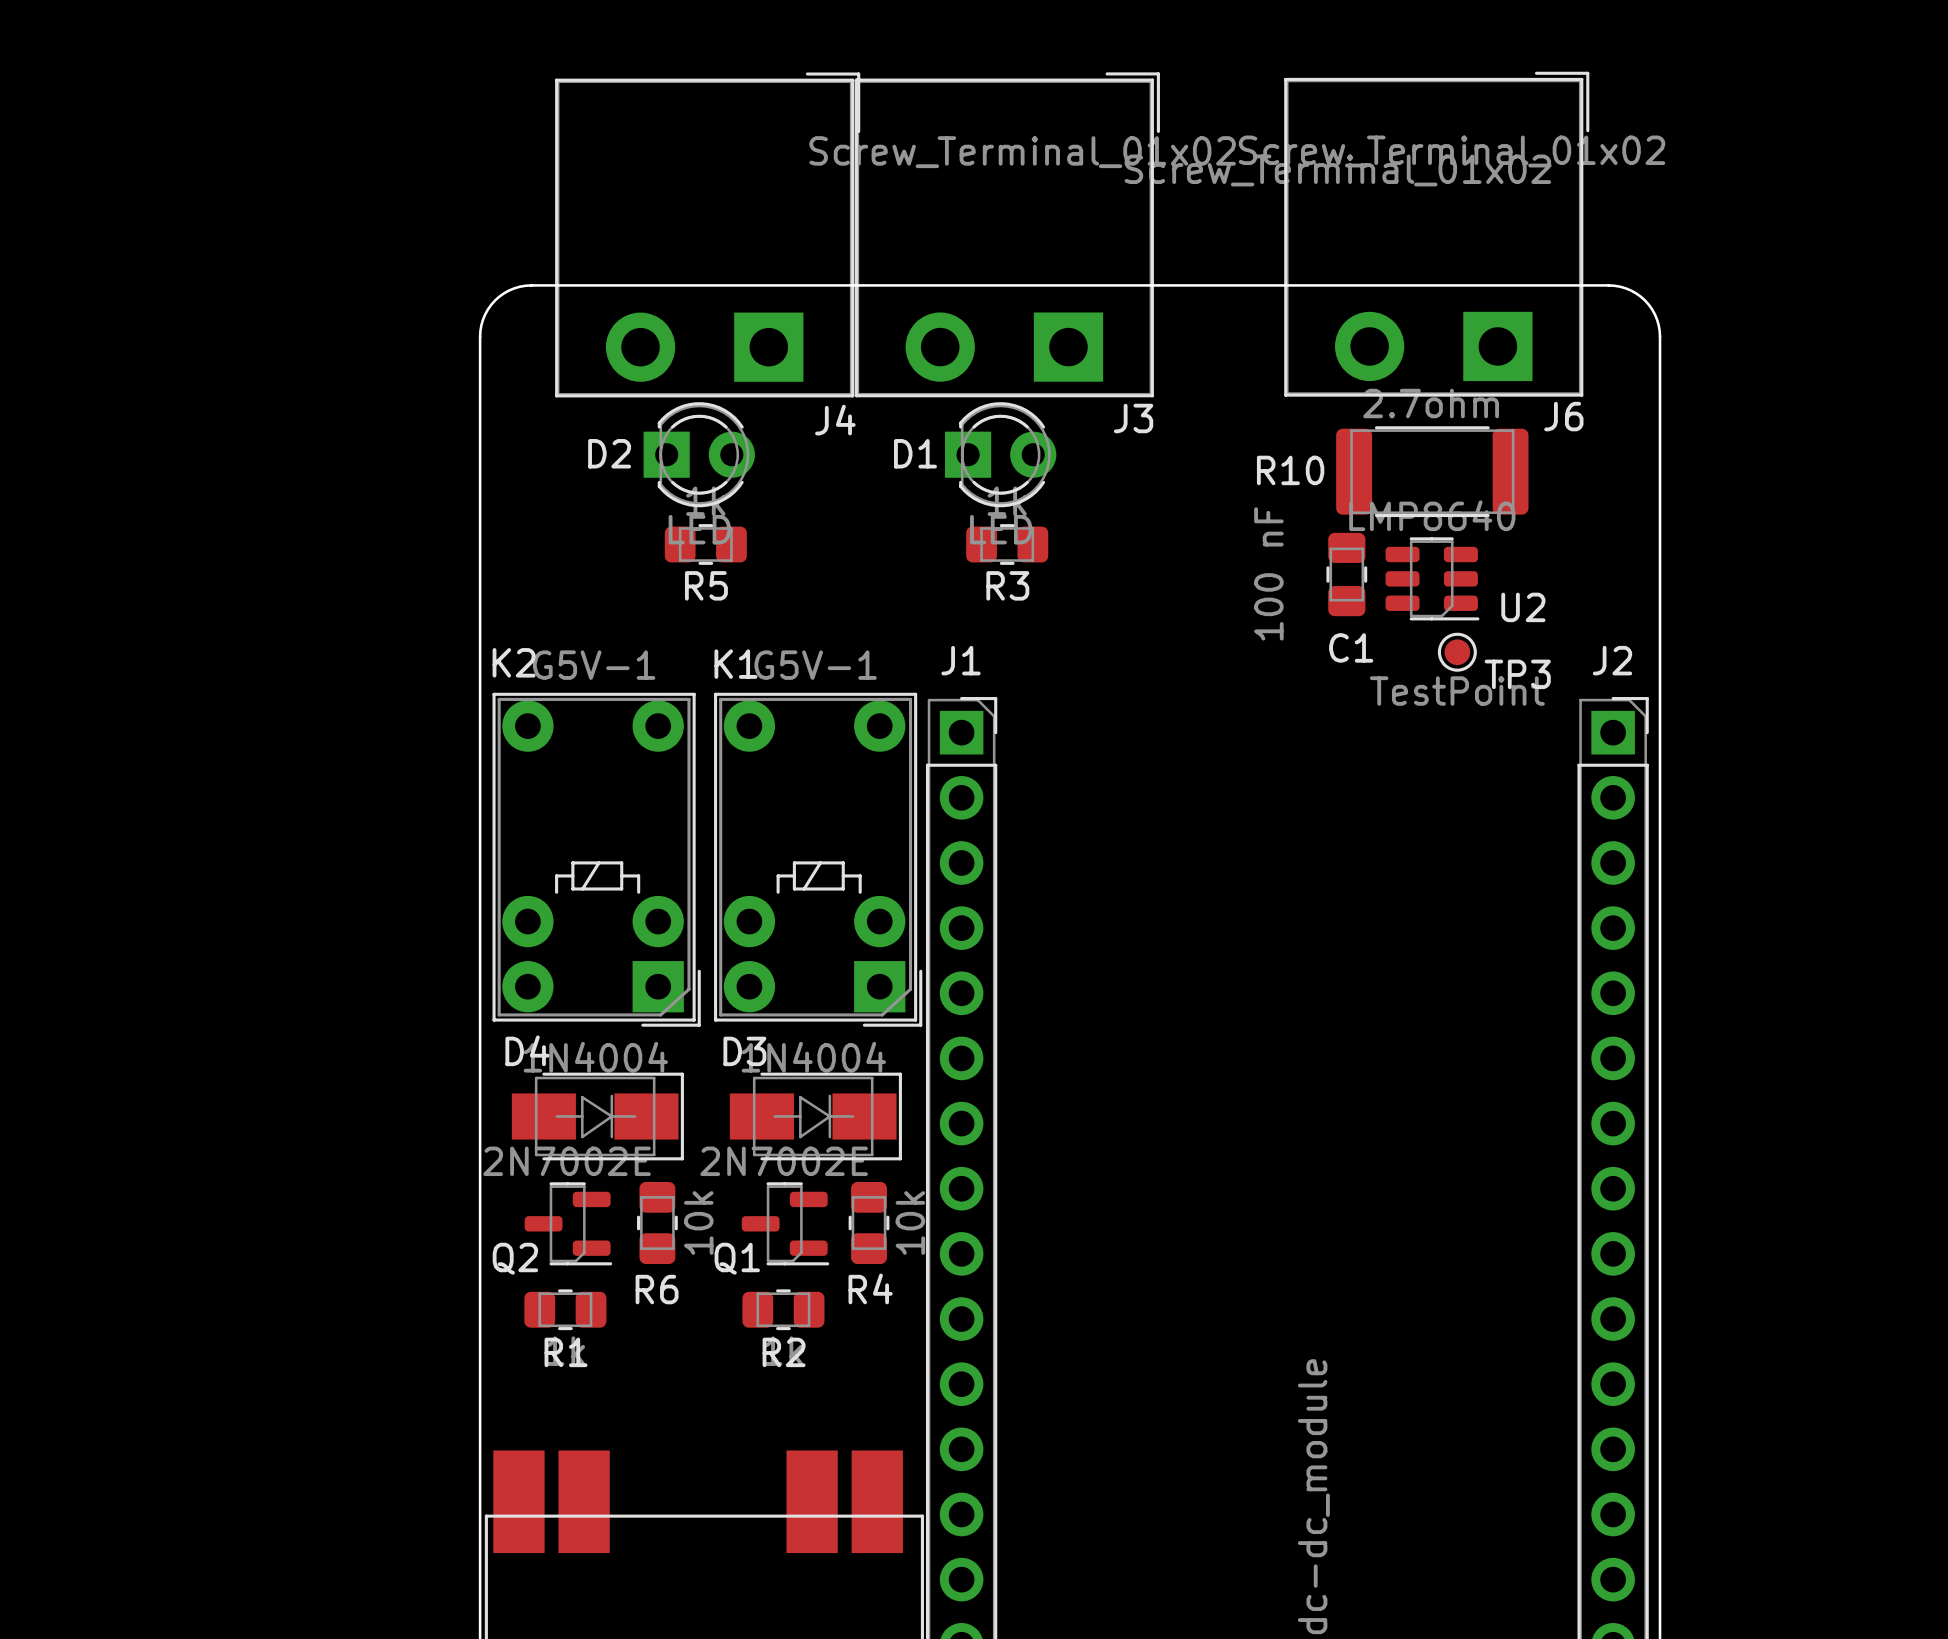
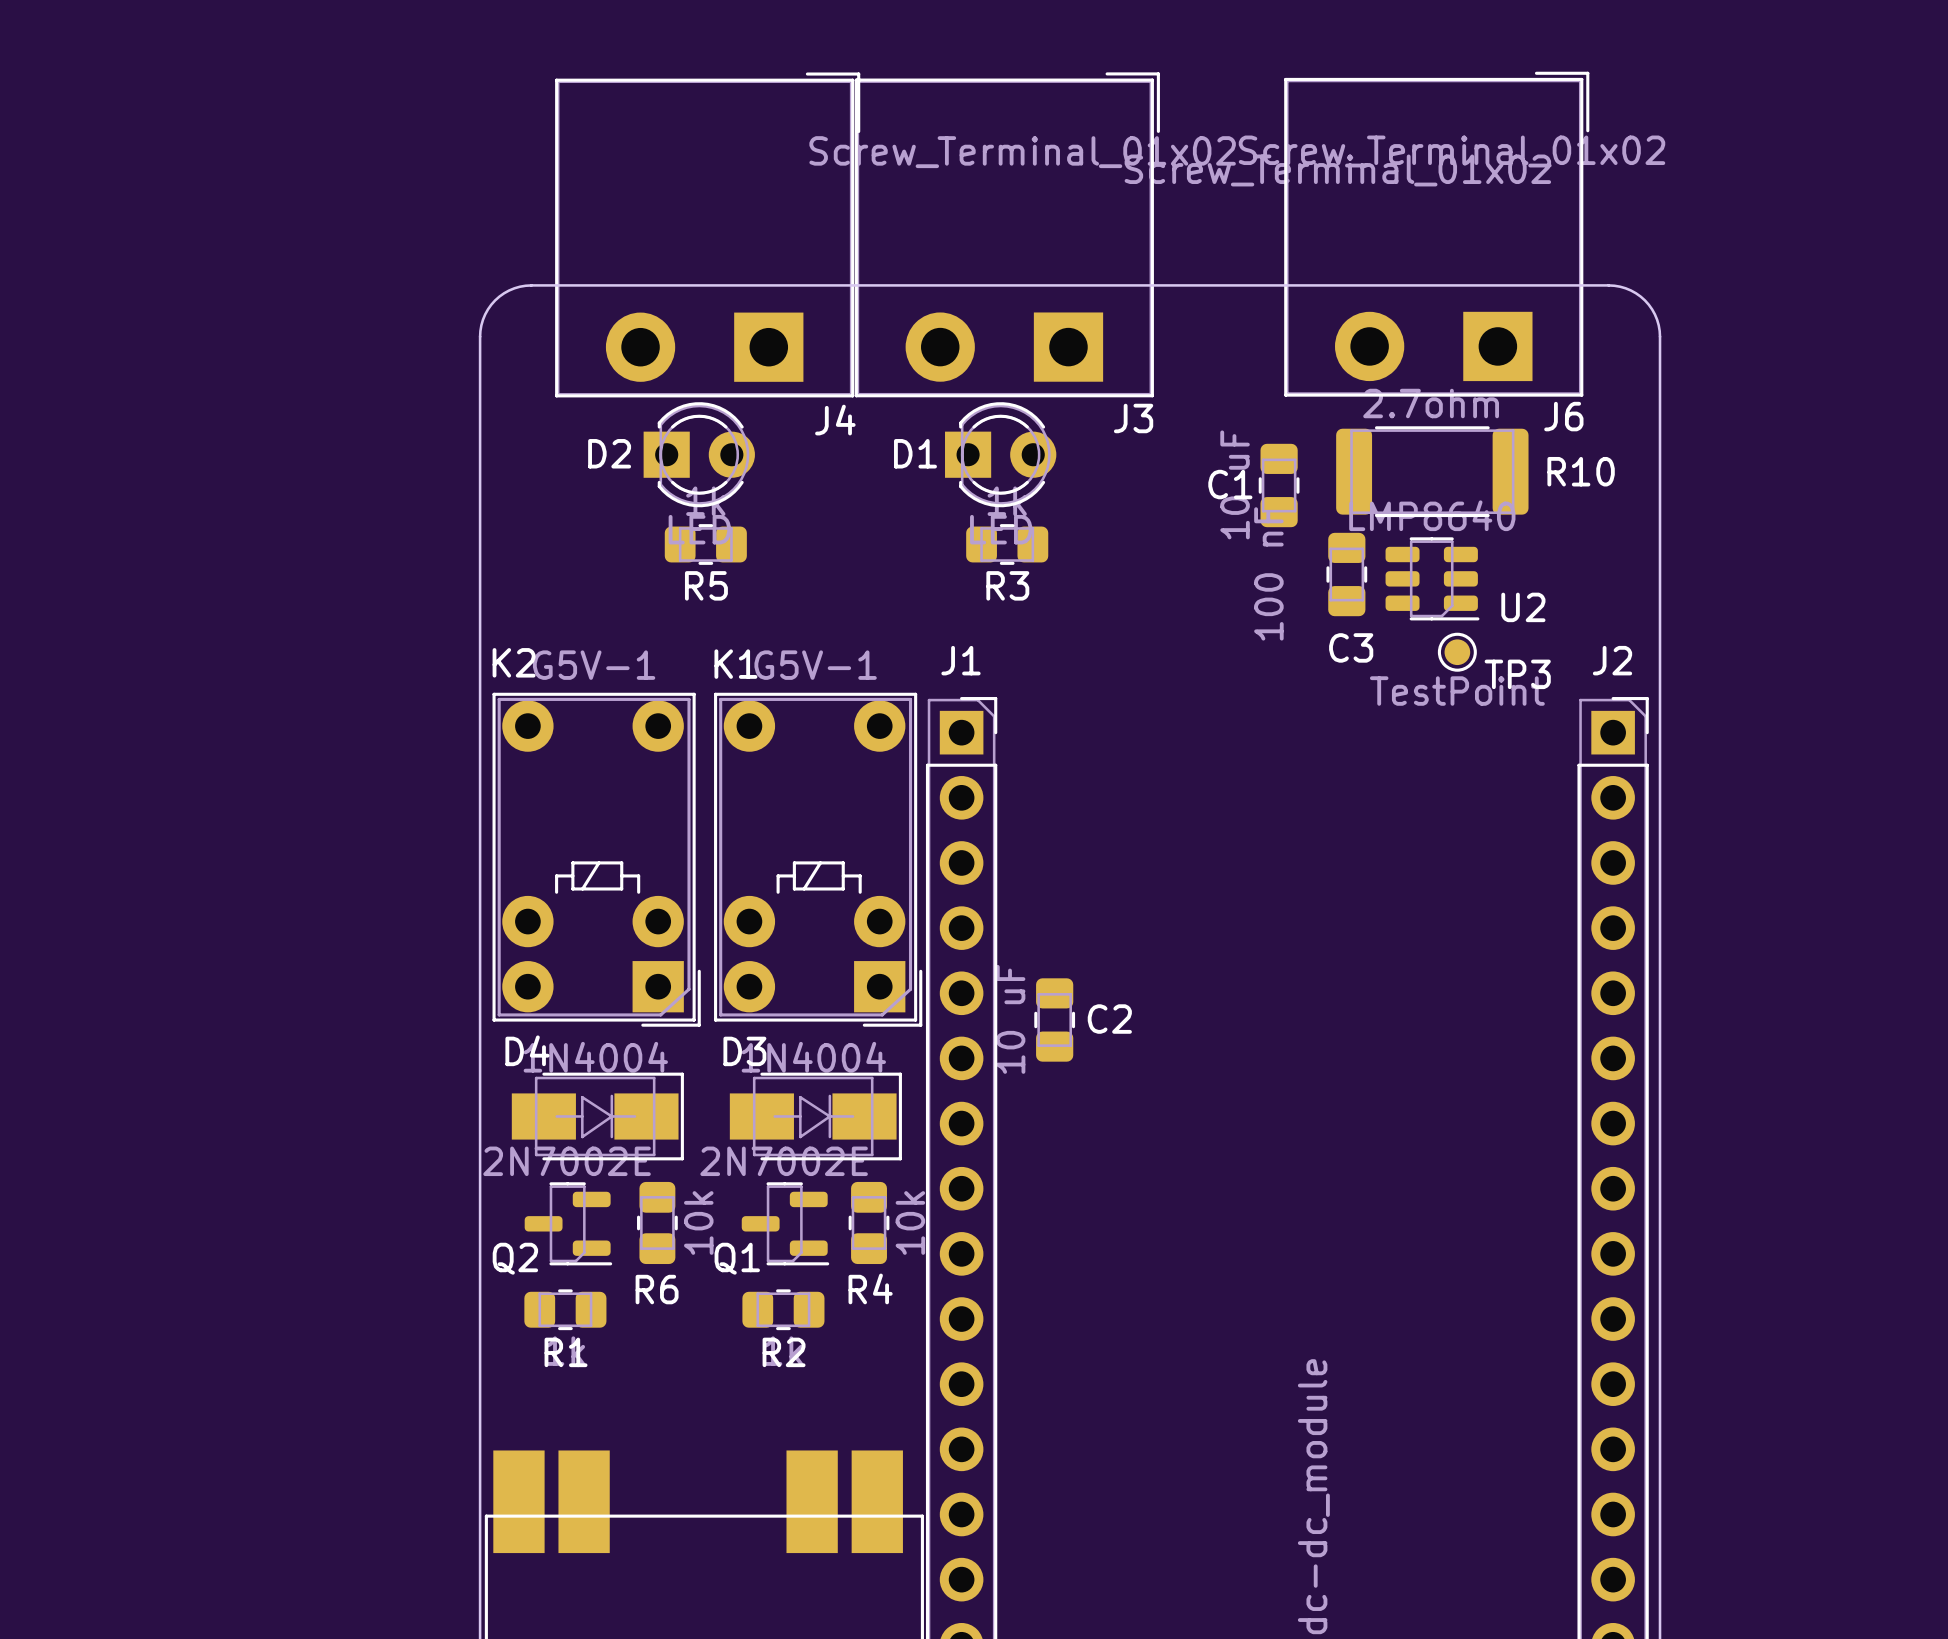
R10 name position: R10 (1290, 470) -> R10 (1581, 471)
C1: none -> 10 uF (1279, 485)
C1 name: C1 (1351, 647) -> C3 (1351, 647)
C2: none -> 10 uF (1054, 1019)

